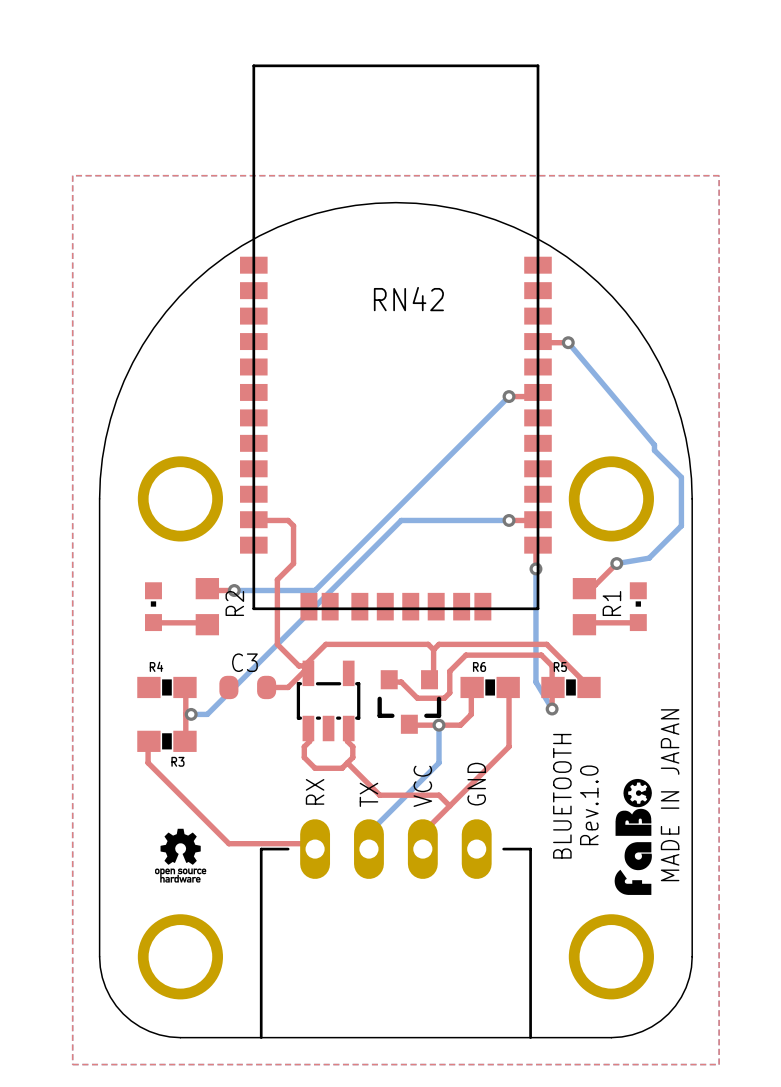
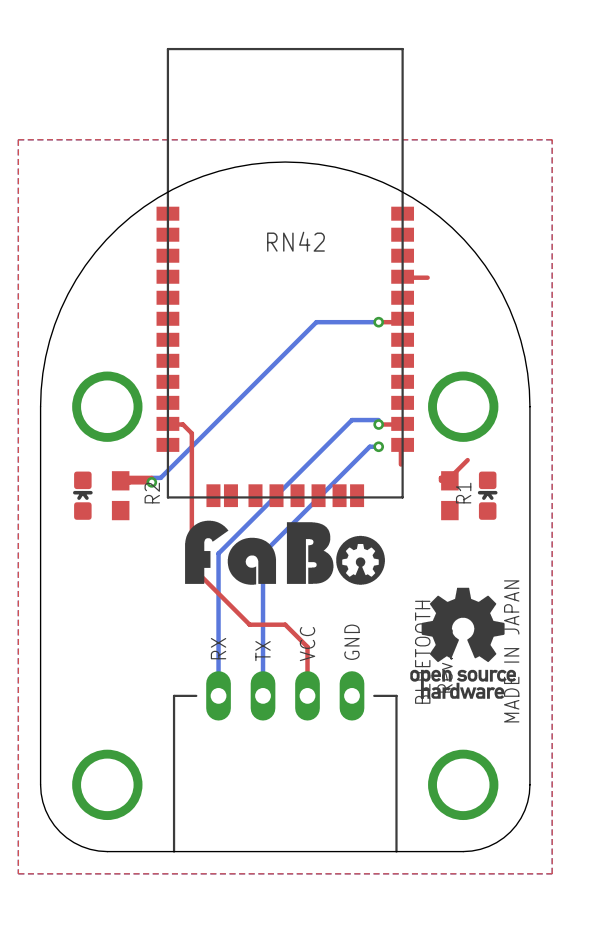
bottom track: (568, 342) (654, 445) (654, 450) (681, 477) (681, 525) (649, 558) (616, 563) -> none
via: (568, 342) -> none
bottom track: (509, 396) (315, 590) (234, 590) -> (378, 322) (316, 322) (160, 477) (151, 477)
bottom track: none -> (378, 420) (352, 420) (218, 553) (218, 695)
top track: (271, 520) (288, 520) (293, 525) (293, 563) (277, 579) (277, 644) (298, 665) (309, 665) (308, 673) -> (182, 424) (191, 433) (191, 566) (249, 624) (285, 624) (307, 646) (307, 682)
bottom track: (509, 520) (401, 520) (207, 714) (191, 714) -> none
via: (616, 563) -> none
bottom track: (535, 568) (535, 682) (552, 709) -> none
via position: (535, 568) -> (378, 446)
R2 footprint: [195, 578, 220, 636] -> [111, 471, 130, 521]
R1 footprint: [572, 578, 597, 636] -> [441, 471, 459, 521]
part footprint: [144, 582, 162, 632] -> [73, 471, 93, 520]
part footprint: [629, 582, 647, 632] -> [477, 471, 498, 520]
top track: none -> (151, 477) (126, 477) (120, 480)
top track: (153, 622) (207, 622) (207, 624) -> none
top track: (638, 622) (584, 622) (584, 624) -> none
drawing: none -> [185, 520, 385, 585]
top track: (433, 649) (433, 676) (429, 679) -> none
top track: (433, 649) (439, 644) (546, 644) (589, 687) -> none
top track: (433, 649) (428, 644) (325, 644) (304, 665) (308, 673) -> none
top track: (308, 673) (304, 671) (288, 687) (266, 687) -> none
top track: (389, 679) (390, 682) (401, 682) (417, 698) (444, 698) (449, 692) (449, 671) (465, 655) (541, 655) (552, 665) (552, 709) -> none
R4: (166, 687) -> none
top track: (184, 687) (184, 741) -> none
C3: (247, 687) -> none
top track: (472, 687) (471, 714) (460, 725) (409, 724) -> none
R6: (490, 687) -> none
top track: (508, 687) (509, 746) (422, 832) -> none
R5: (570, 687) -> none
part: (328, 700) -> none
part: (409, 701) -> none
via: (552, 709) -> none
via: (191, 714) -> none
drawing: none -> [410, 587, 516, 699]
bottom track: (439, 725) (439, 762) (368, 832) -> (378, 446) (369, 446) (263, 553) (263, 682)
via: (439, 725) -> none
top track: (308, 728) (309, 741) (304, 746) (304, 757) (315, 768) (342, 768) (352, 757) (352, 746) (347, 741) (348, 728) -> none
top track: (148, 741) (148, 762) (228, 843) (309, 843) (315, 849) -> none
R3: (166, 741) -> none
top track: (347, 762) (379, 795) (439, 795) (449, 805) -> none
drawing: [614, 778, 652, 895] -> none
drawing: [155, 828, 207, 883] -> none

